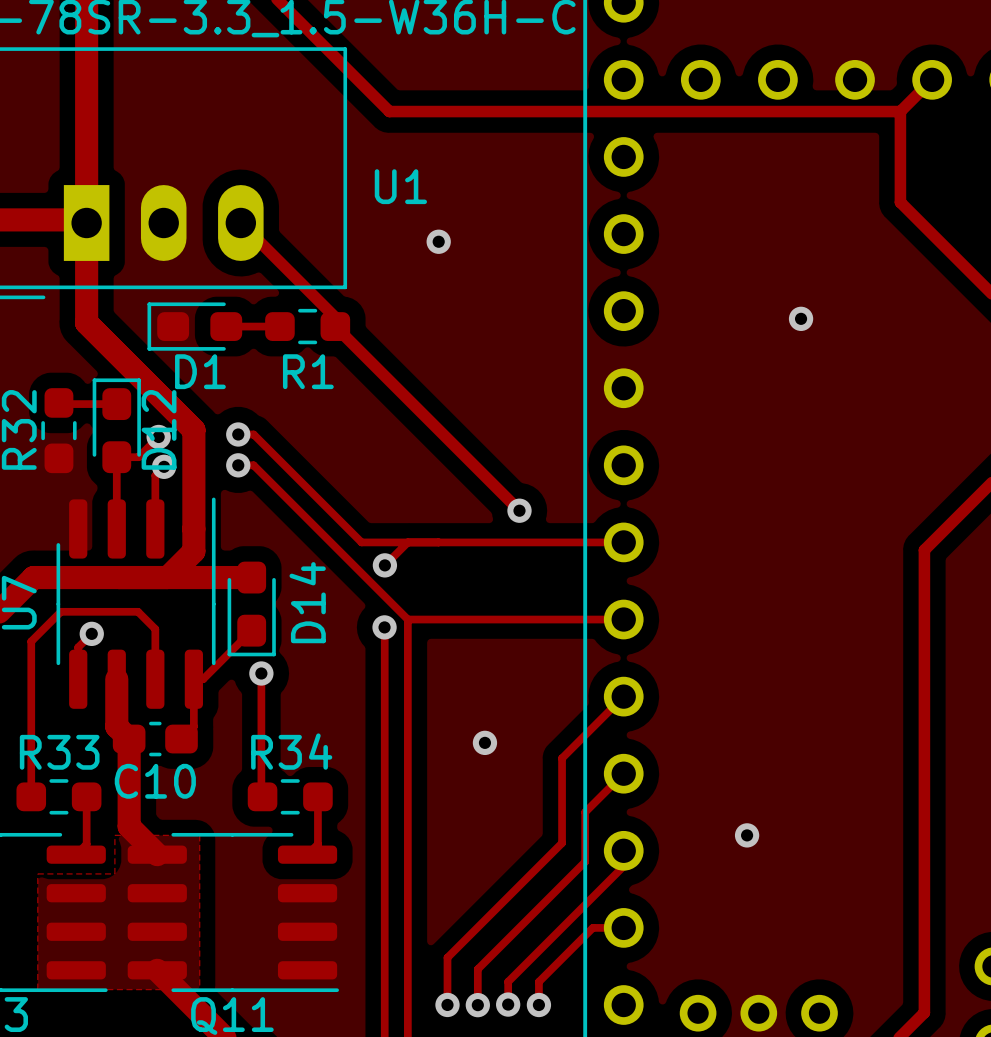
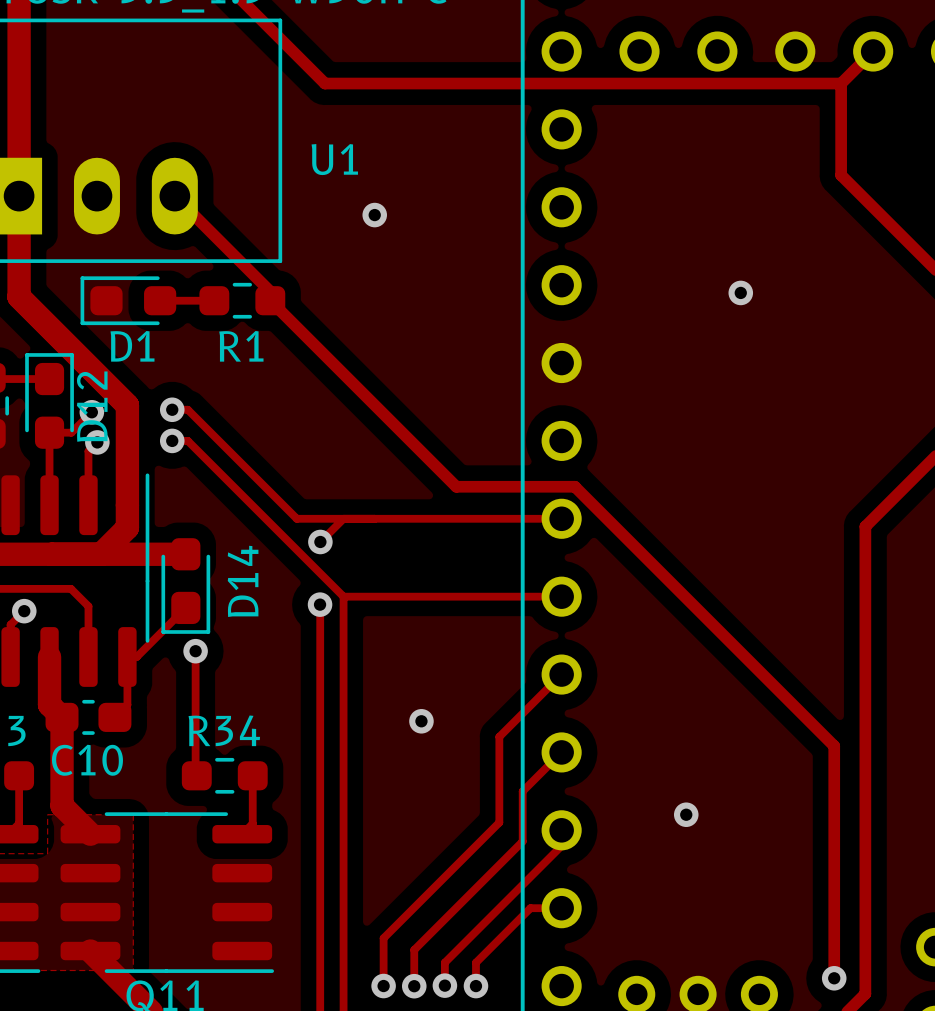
track: none -> (456, 486) (574, 486) (834, 746) (834, 978)
via: (519, 510) -> none
via: none -> (834, 978)

